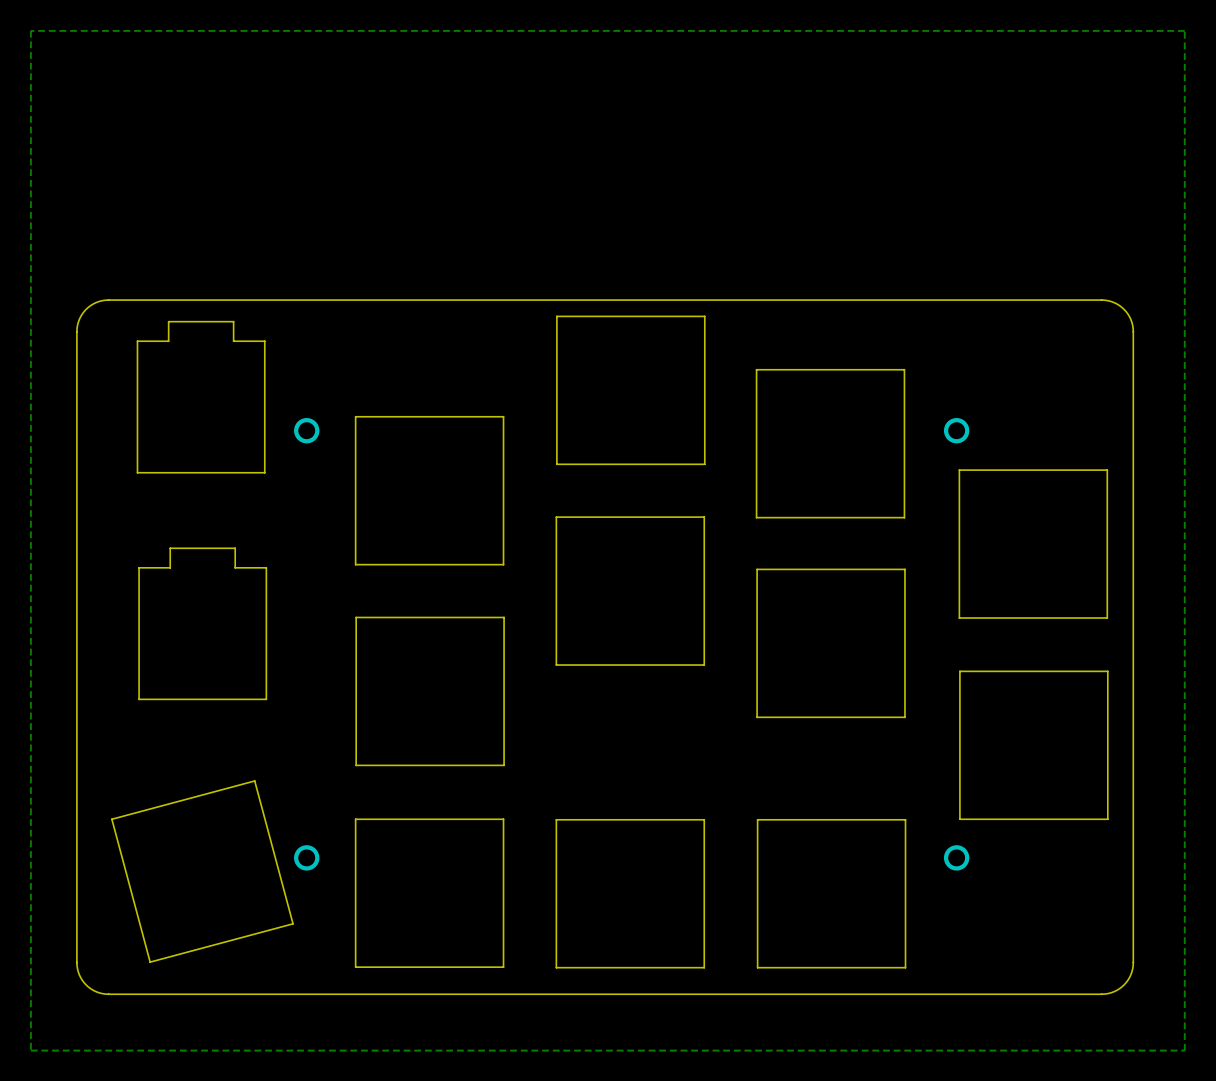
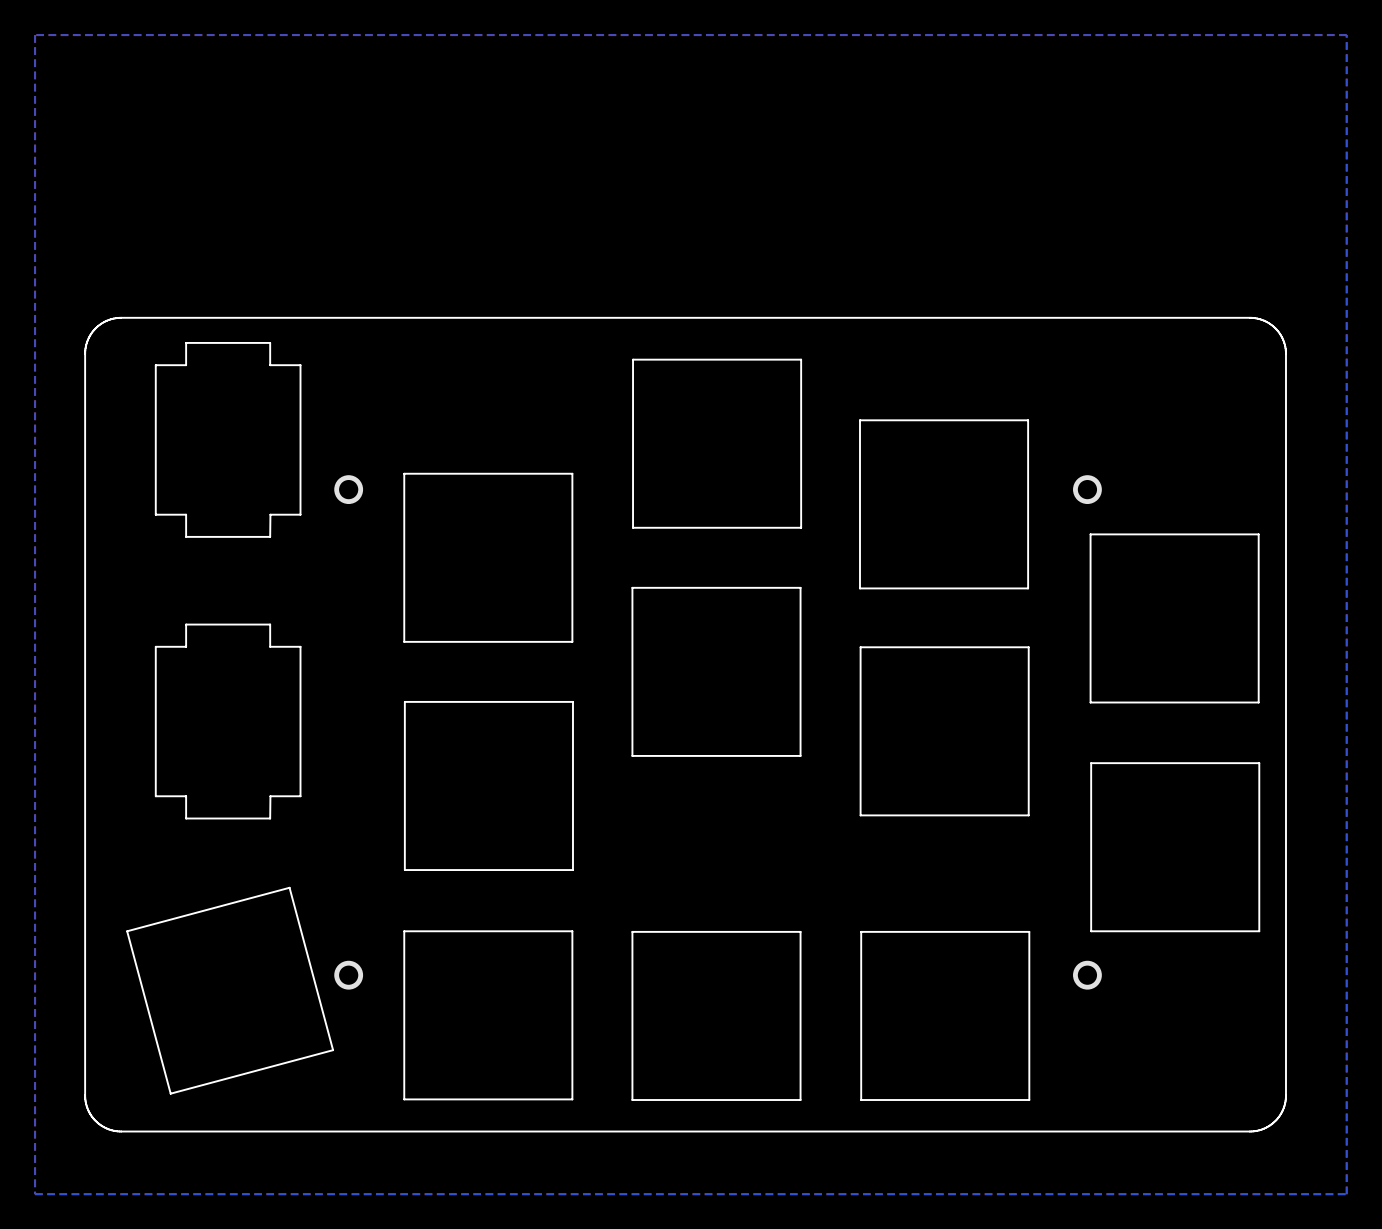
board edge: (1101, 300) (108, 300) (90, 305) (80, 316) (76, 331) (76, 962) (82, 980) (93, 990) (108, 994) (1101, 994) (1119, 988) (1129, 977) (1133, 962) (1133, 331) (1130, 319) (1124, 309) (1113, 302) (1101, 300) -> (1249, 317) (1263, 320) (1275, 328) (1283, 339) (1285, 353) (1285, 1095) (1281, 1112) (1270, 1125) (1260, 1129) (1249, 1131) (121, 1131) (103, 1127) (91, 1115) (86, 1106) (85, 1095) (85, 353) (89, 336) (101, 323) (110, 319) (121, 317) (1249, 317)
board edge: (233, 321) (233, 341) (264, 341) (264, 472) (137, 472) (137, 341) (168, 341) (168, 321) (233, 321) -> (270, 342) (270, 365) (300, 365) (300, 514) (270, 514) (270, 536) (186, 536) (186, 514) (155, 514) (155, 365) (186, 365) (186, 342) (270, 342)
board edge: (235, 548) (170, 548) (170, 567) (139, 567) (139, 699) (266, 699) (266, 567) (235, 567) (235, 548) -> (270, 624) (270, 646) (300, 646) (300, 796) (270, 796) (270, 818) (186, 818) (186, 796) (155, 796) (155, 646) (186, 646) (186, 624) (270, 624)

